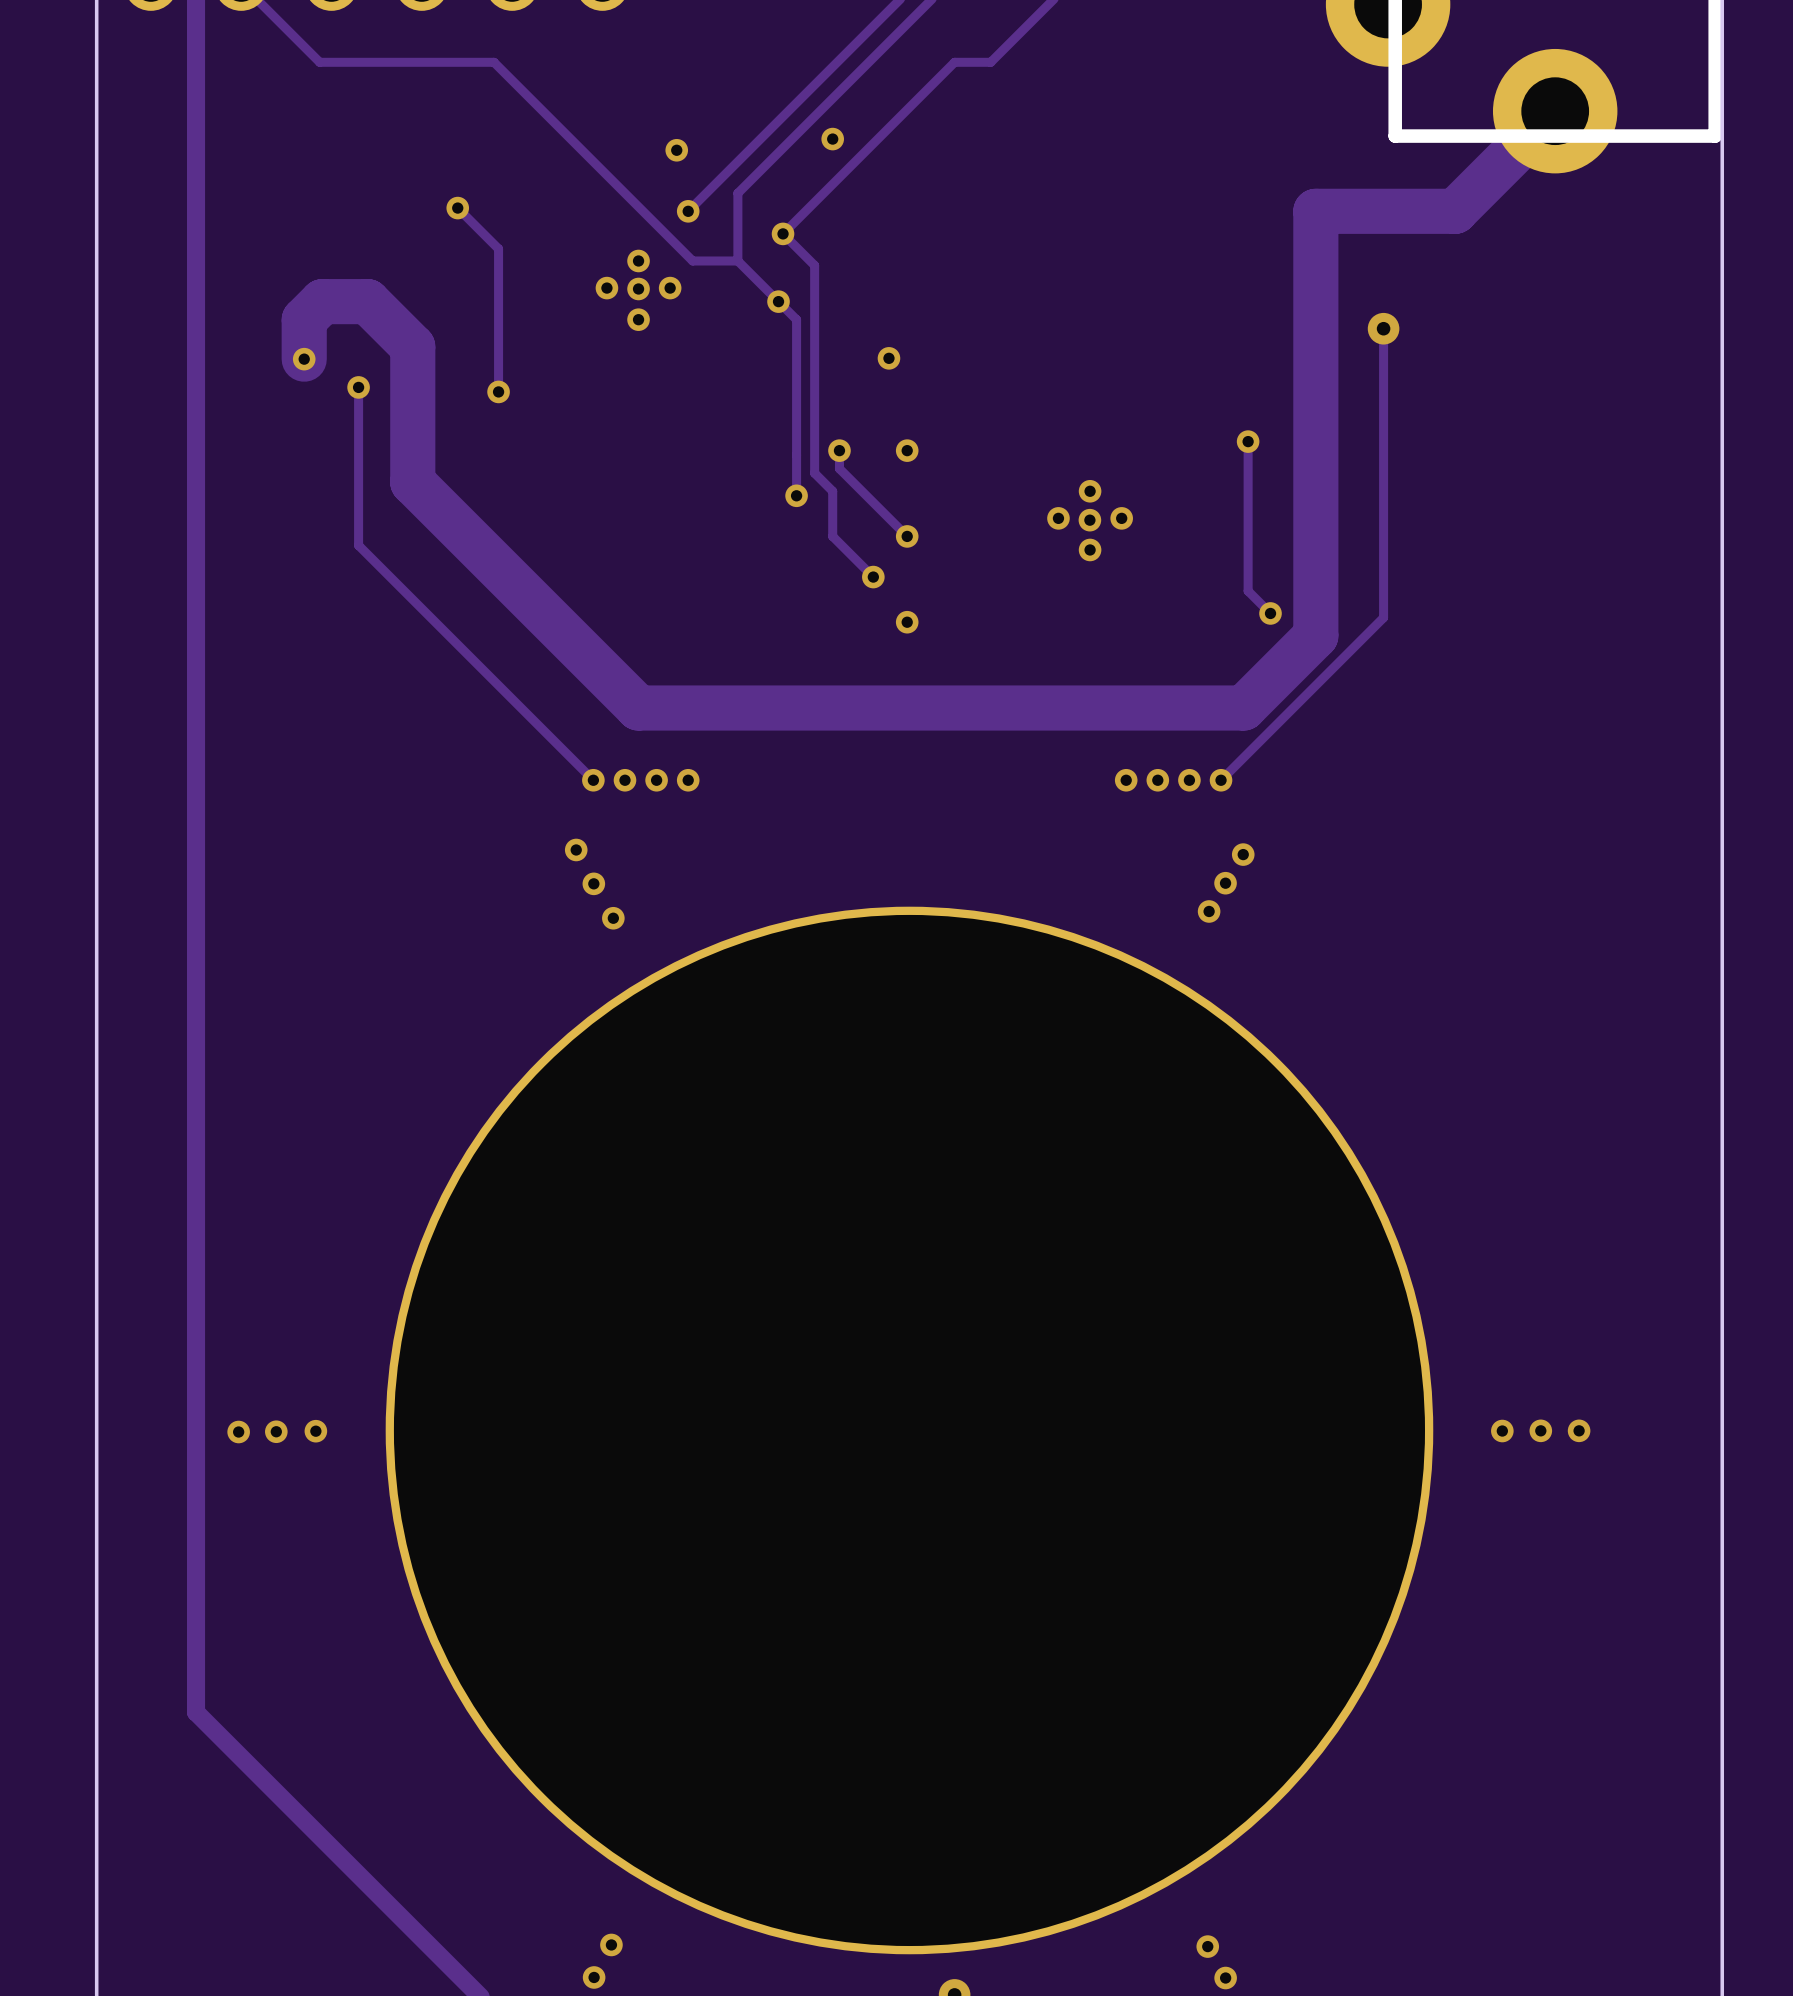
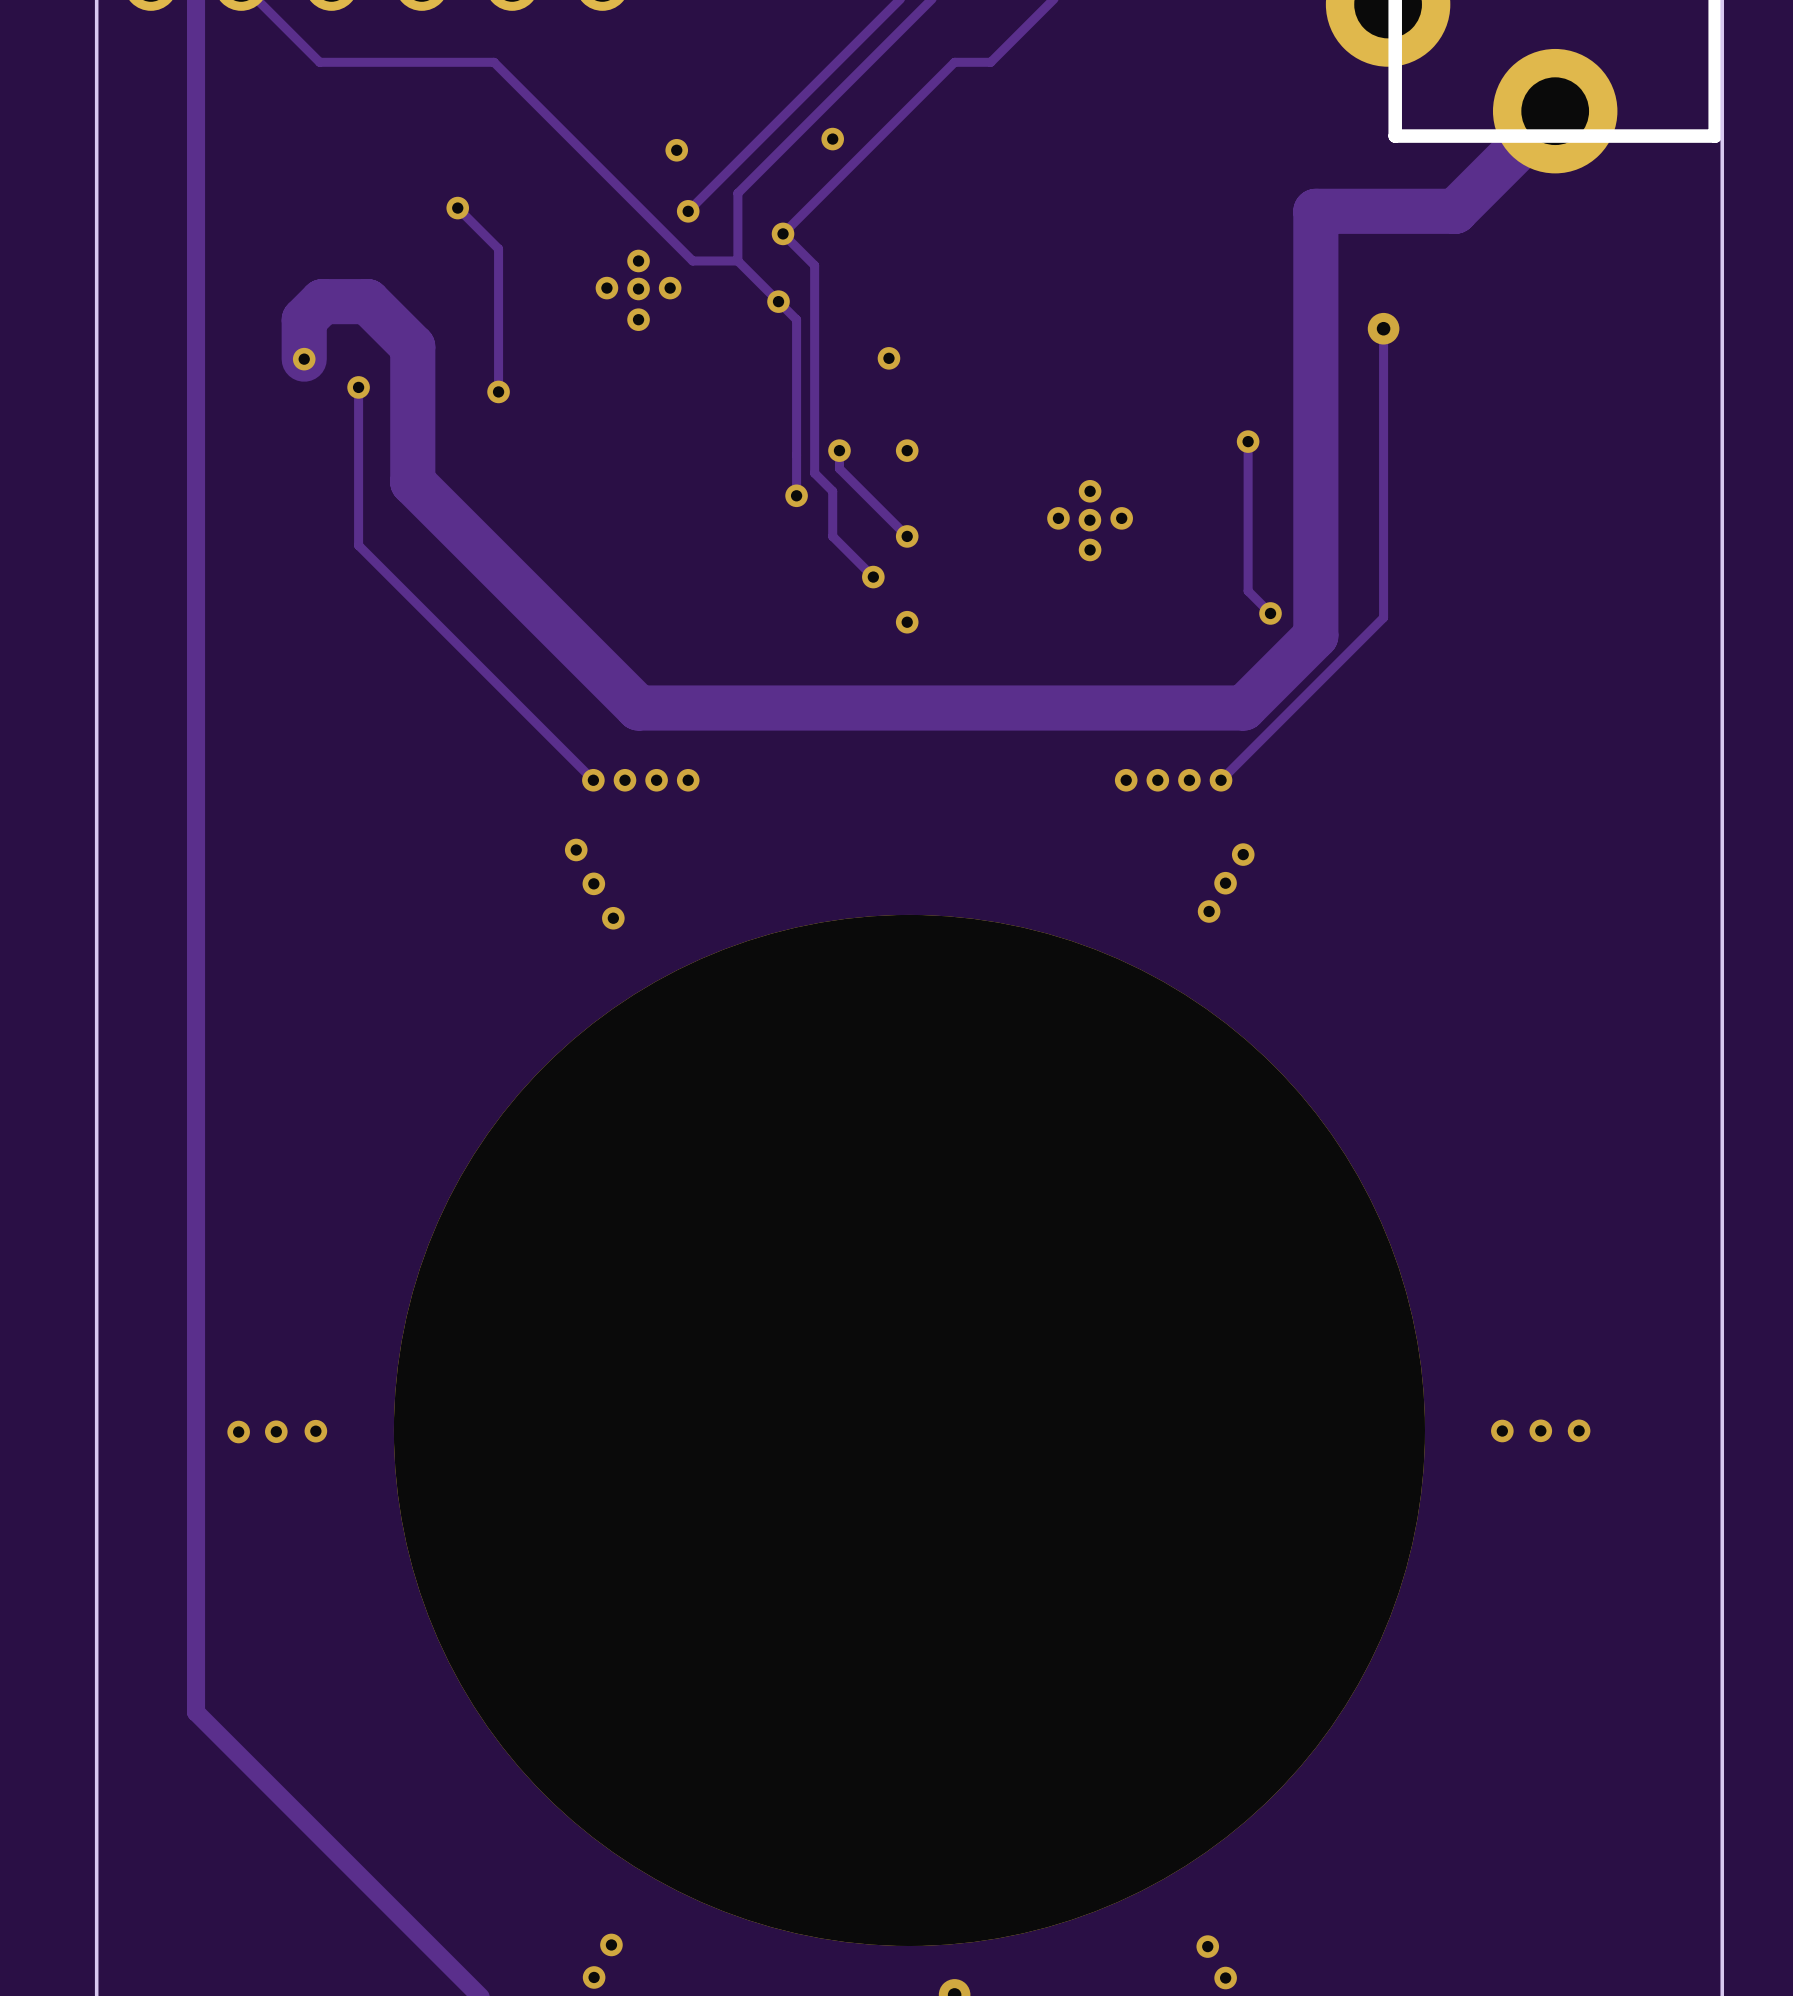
part footprint: [385, 906, 1434, 1955] -> [393, 914, 1426, 1947]

